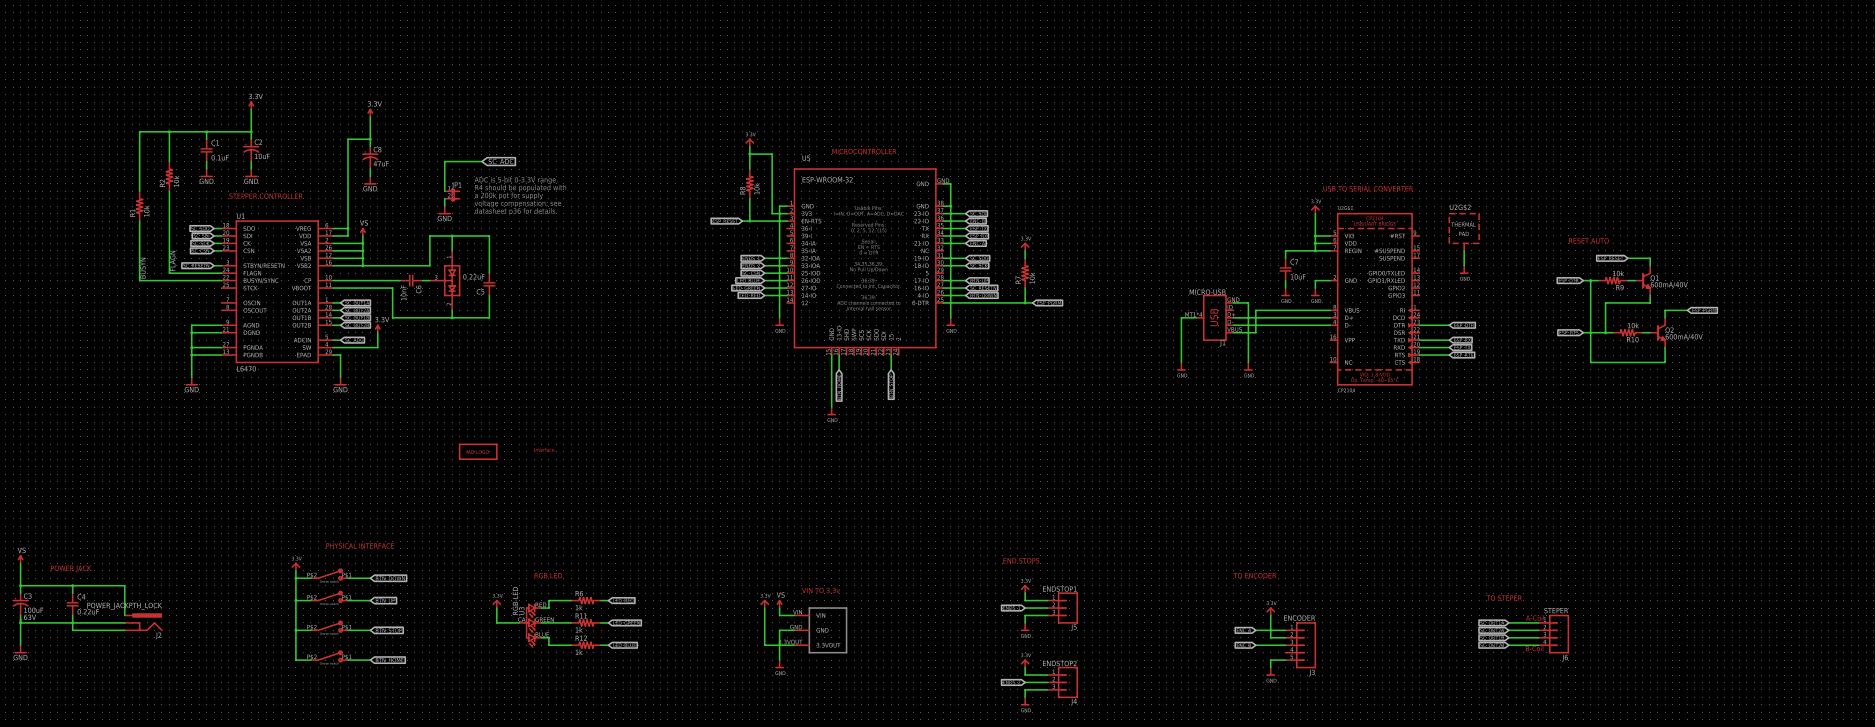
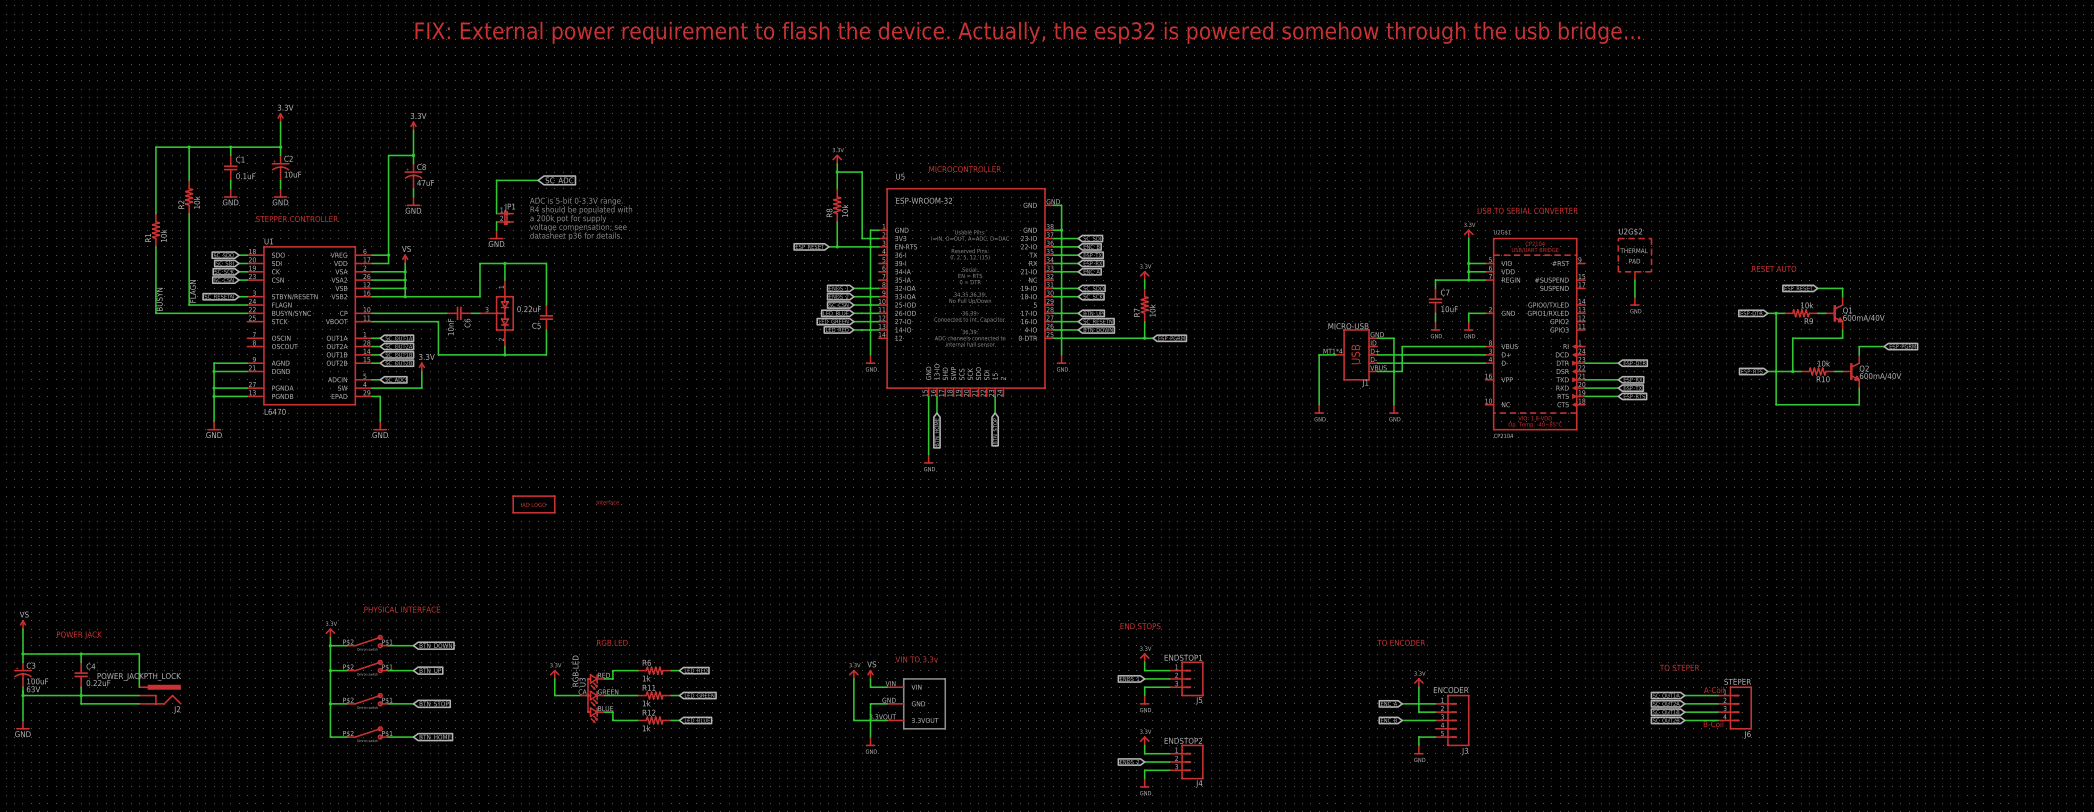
text: none -> FIX: External power requirement to flash the device. Actually, the esp32 is powered somehow through the usb bridge... (1027, 32)

